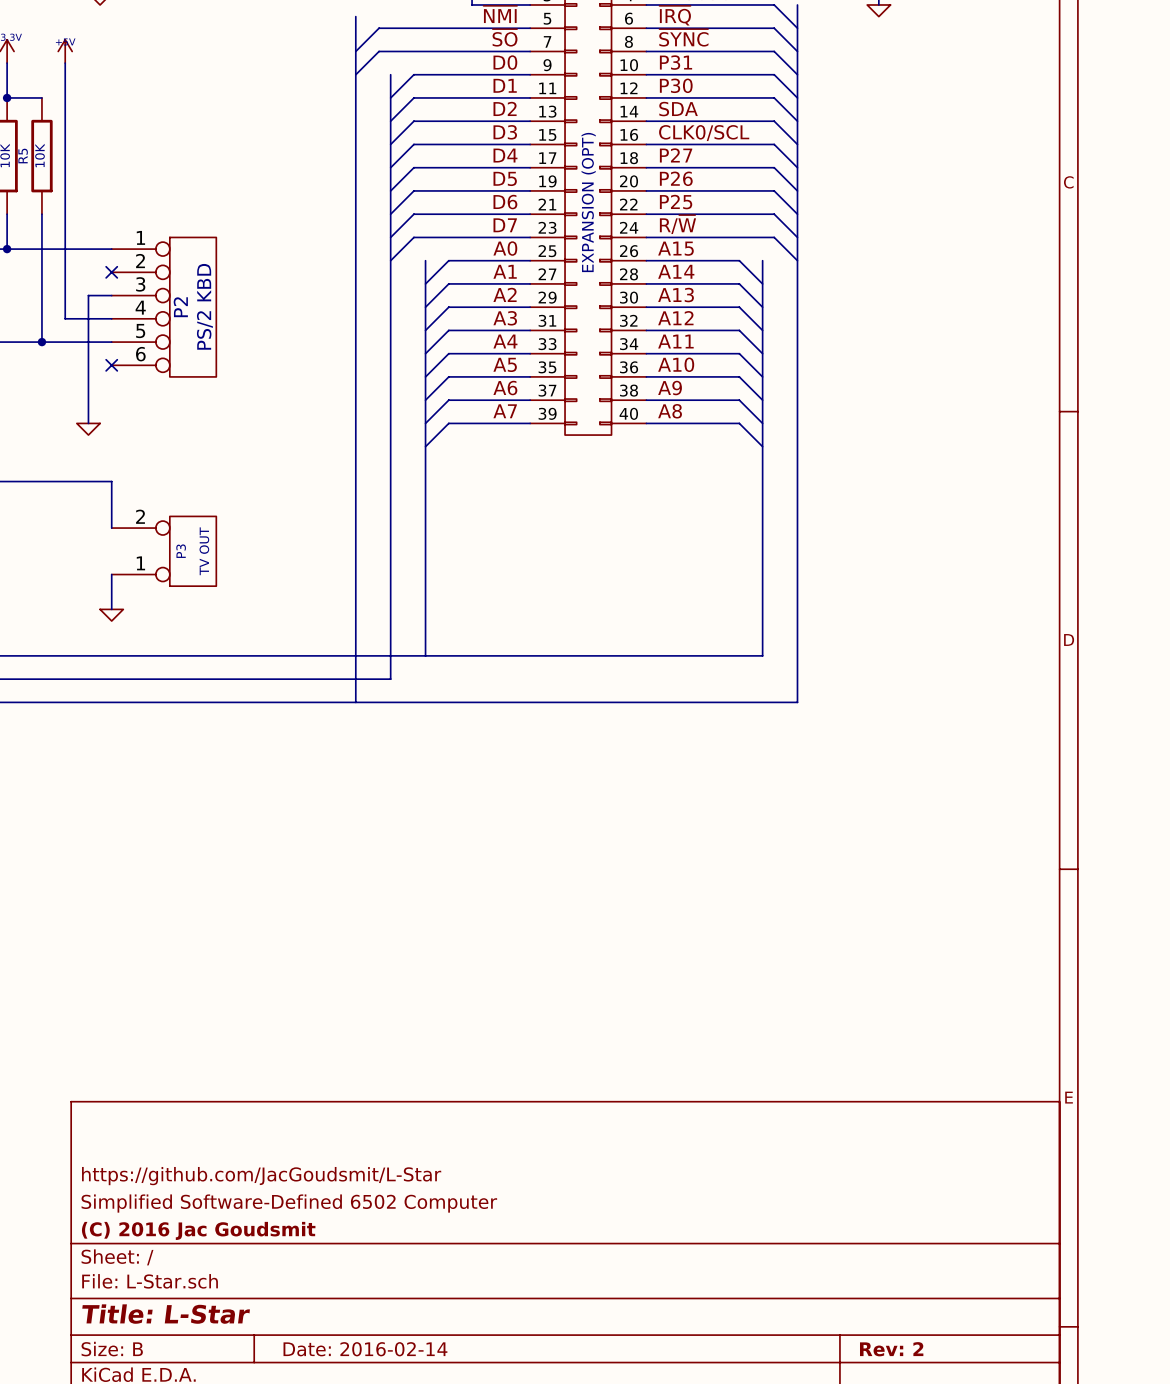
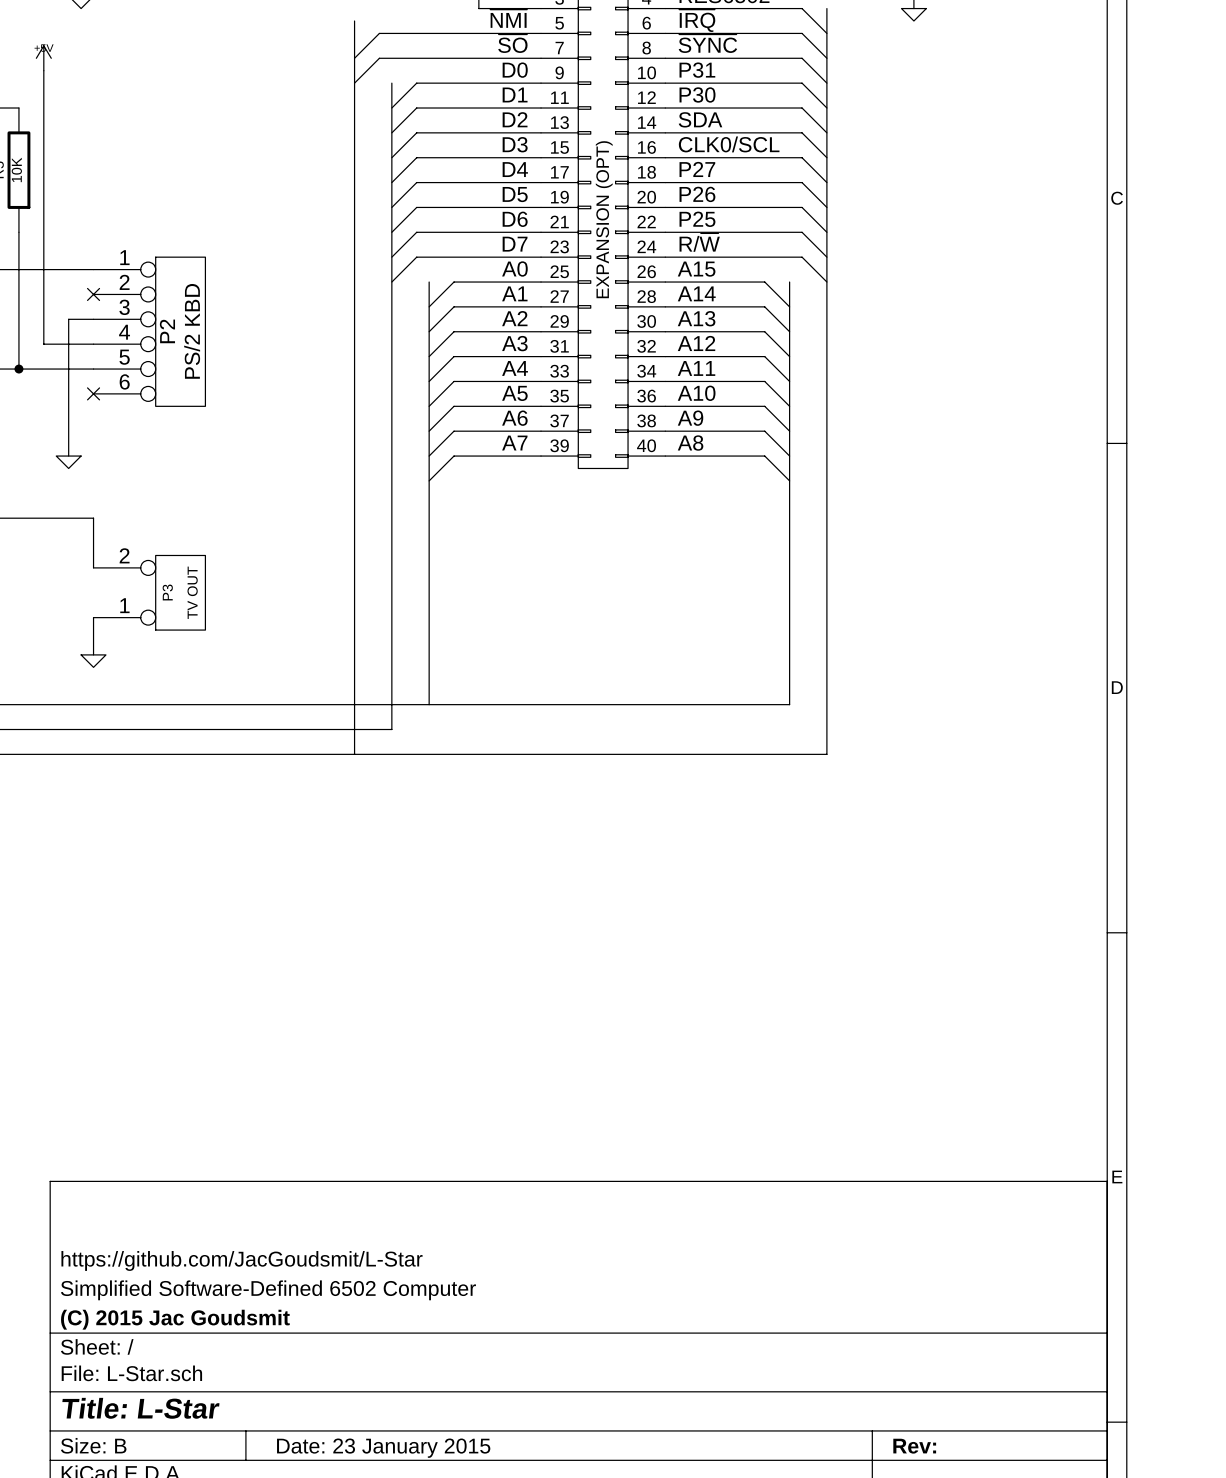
title block: (C) 2016 Jac Goudsmit (198, 1230) -> (C) 2015 Jac Goudsmit (175, 1319)
title block: Date: 2016-02-14 (365, 1349) -> Date: 23 January 2015 (383, 1448)
title block: Rev: 2 (891, 1349) -> Rev: (914, 1446)

